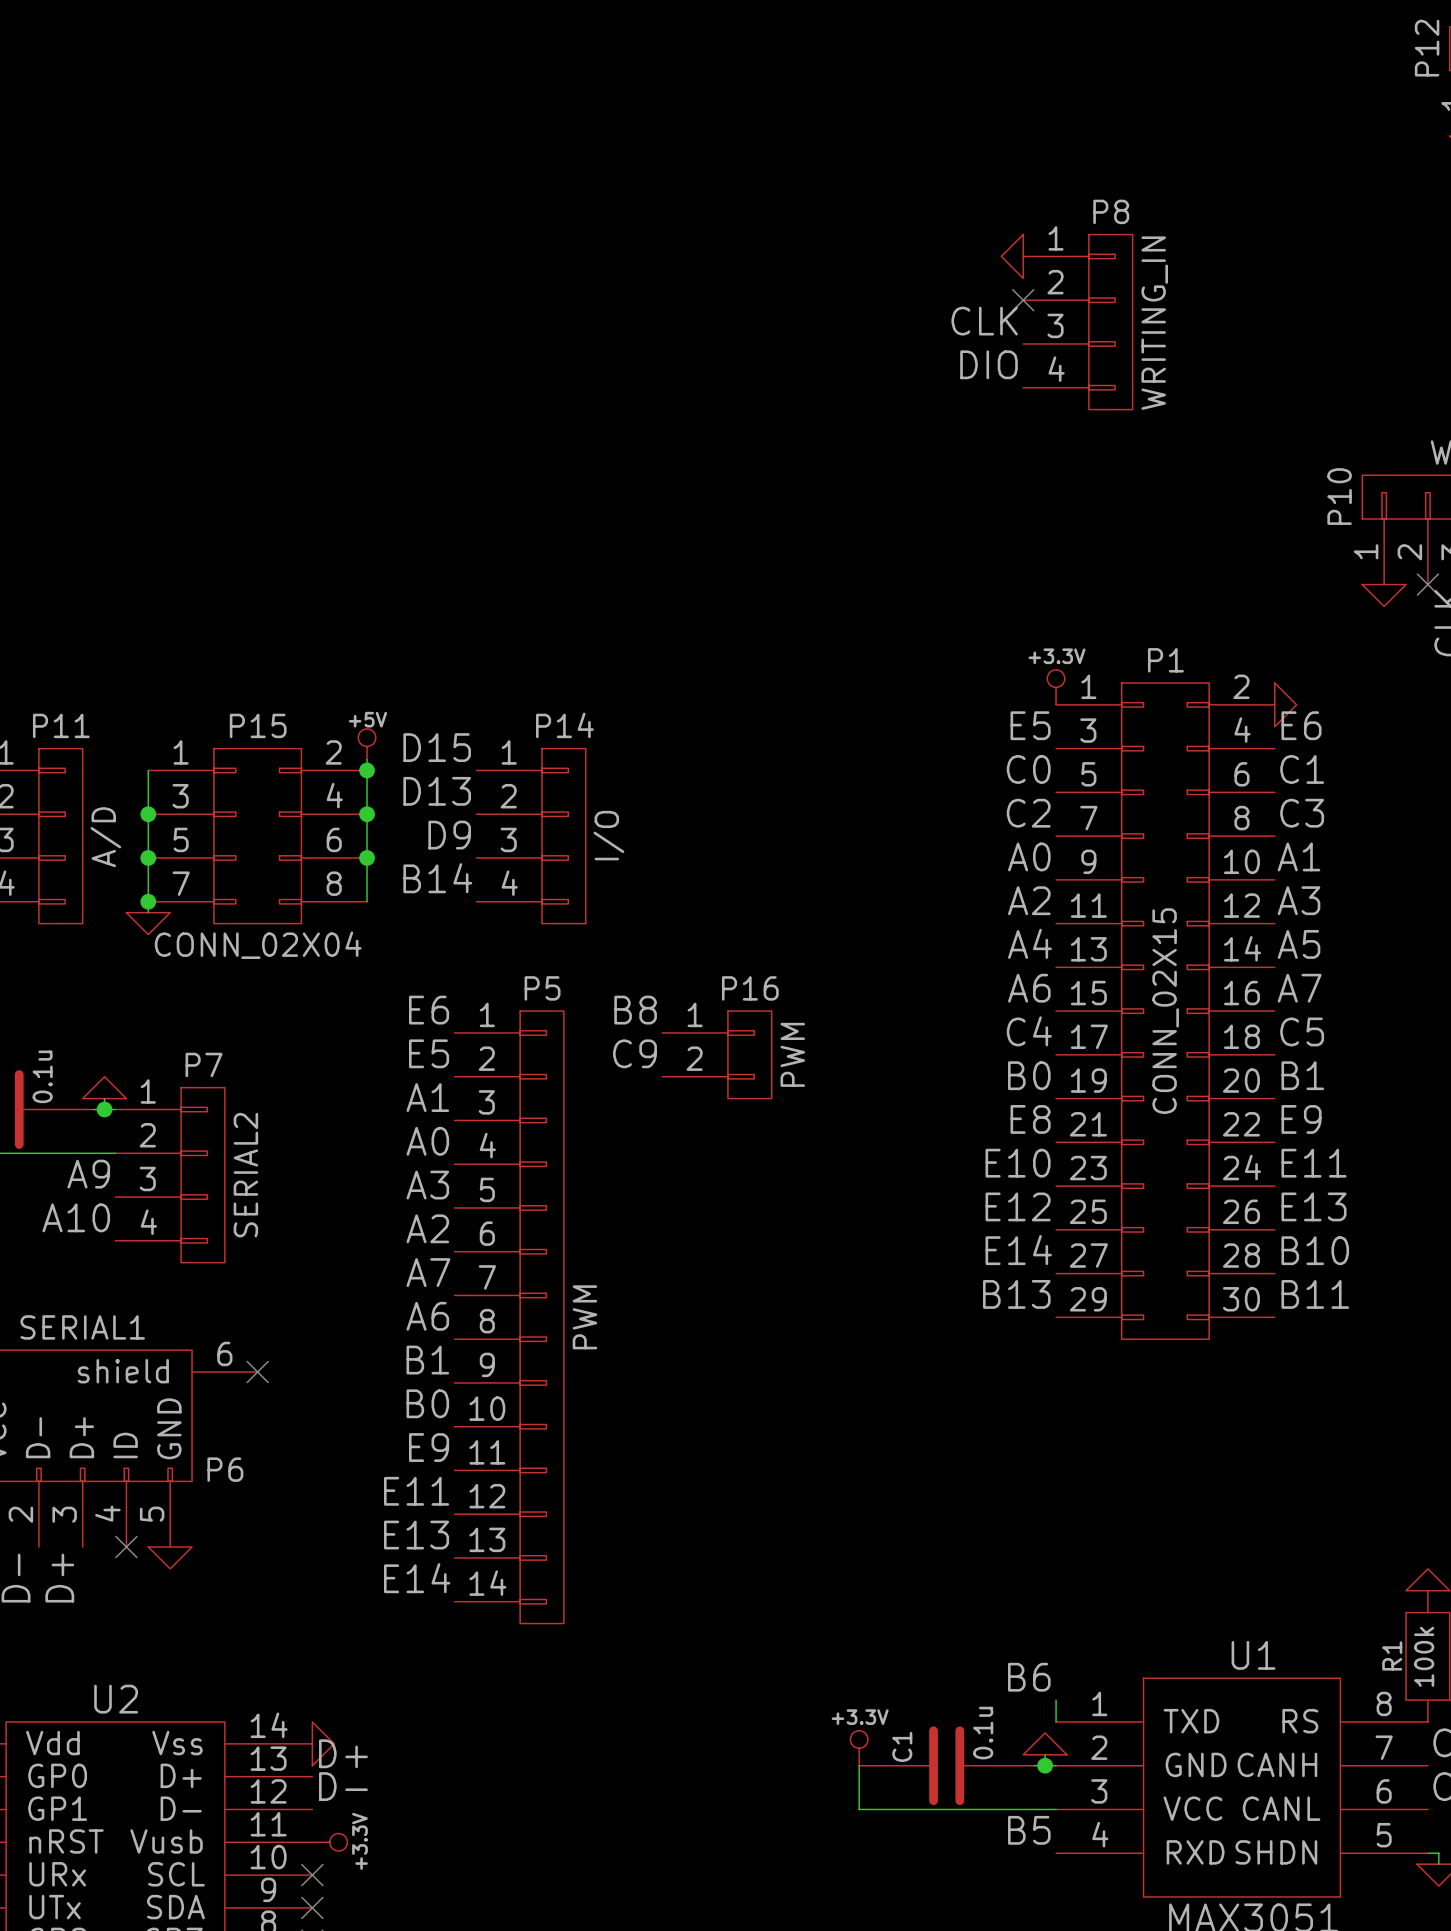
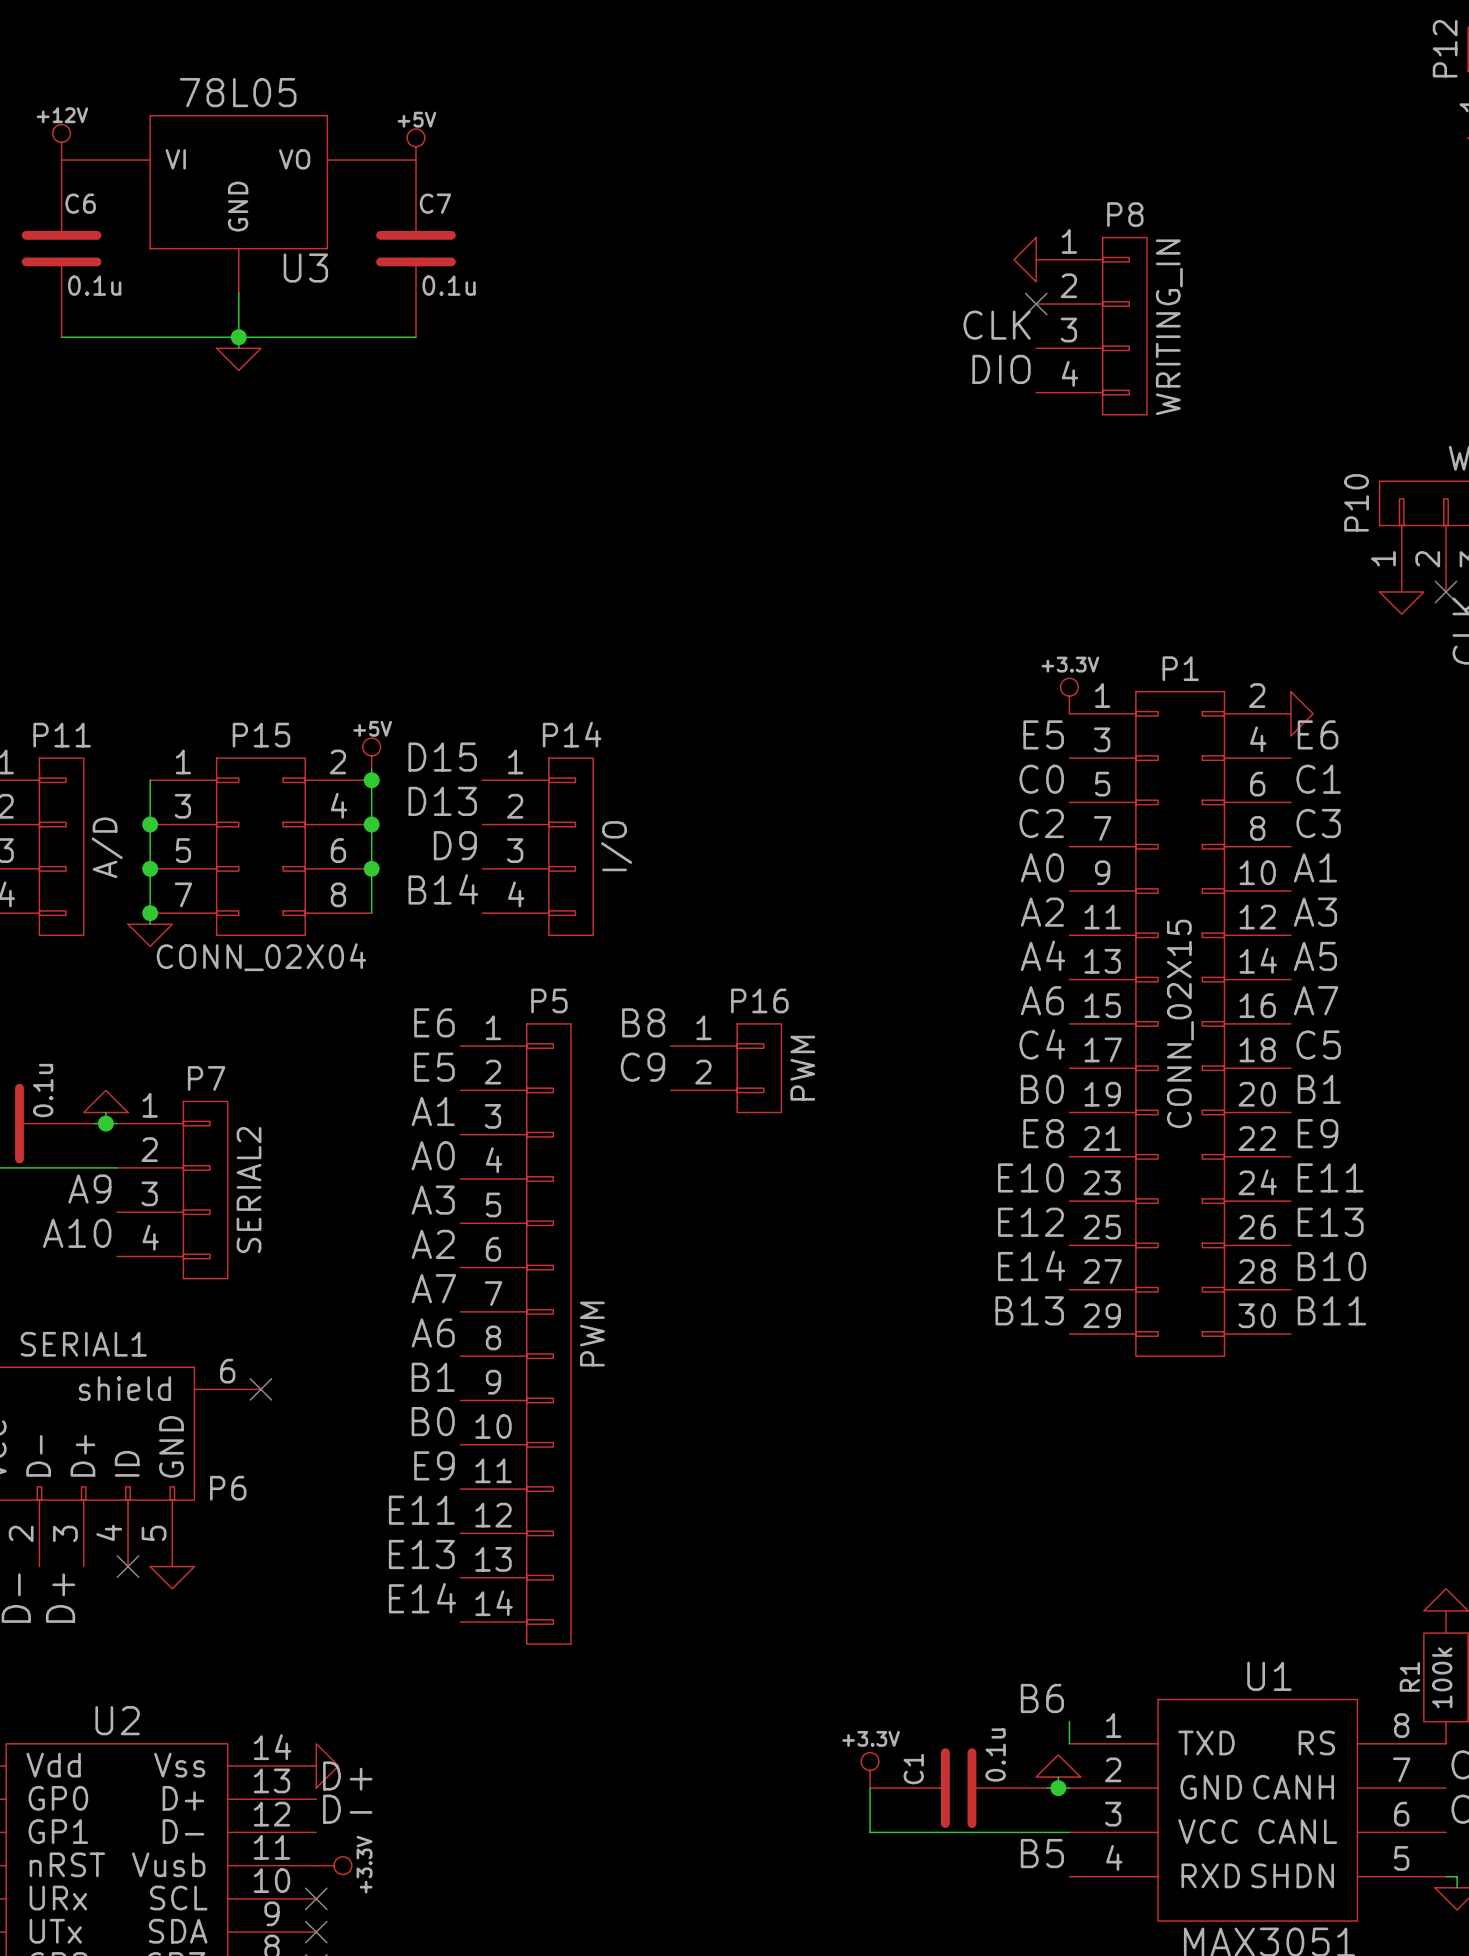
power symbol: none -> +12V (61, 142)
power symbol: none -> +5V (415, 144)
U3: none -> 78L05 (238, 204)
C6: none -> 0.1u (61, 248)
C7: none -> 0.1u (415, 248)
wire: none -> (238, 292) (238, 348)
wire: none -> (61, 337) (415, 337)
junction: none -> (238, 337)
power symbol: none -> (238, 359)

